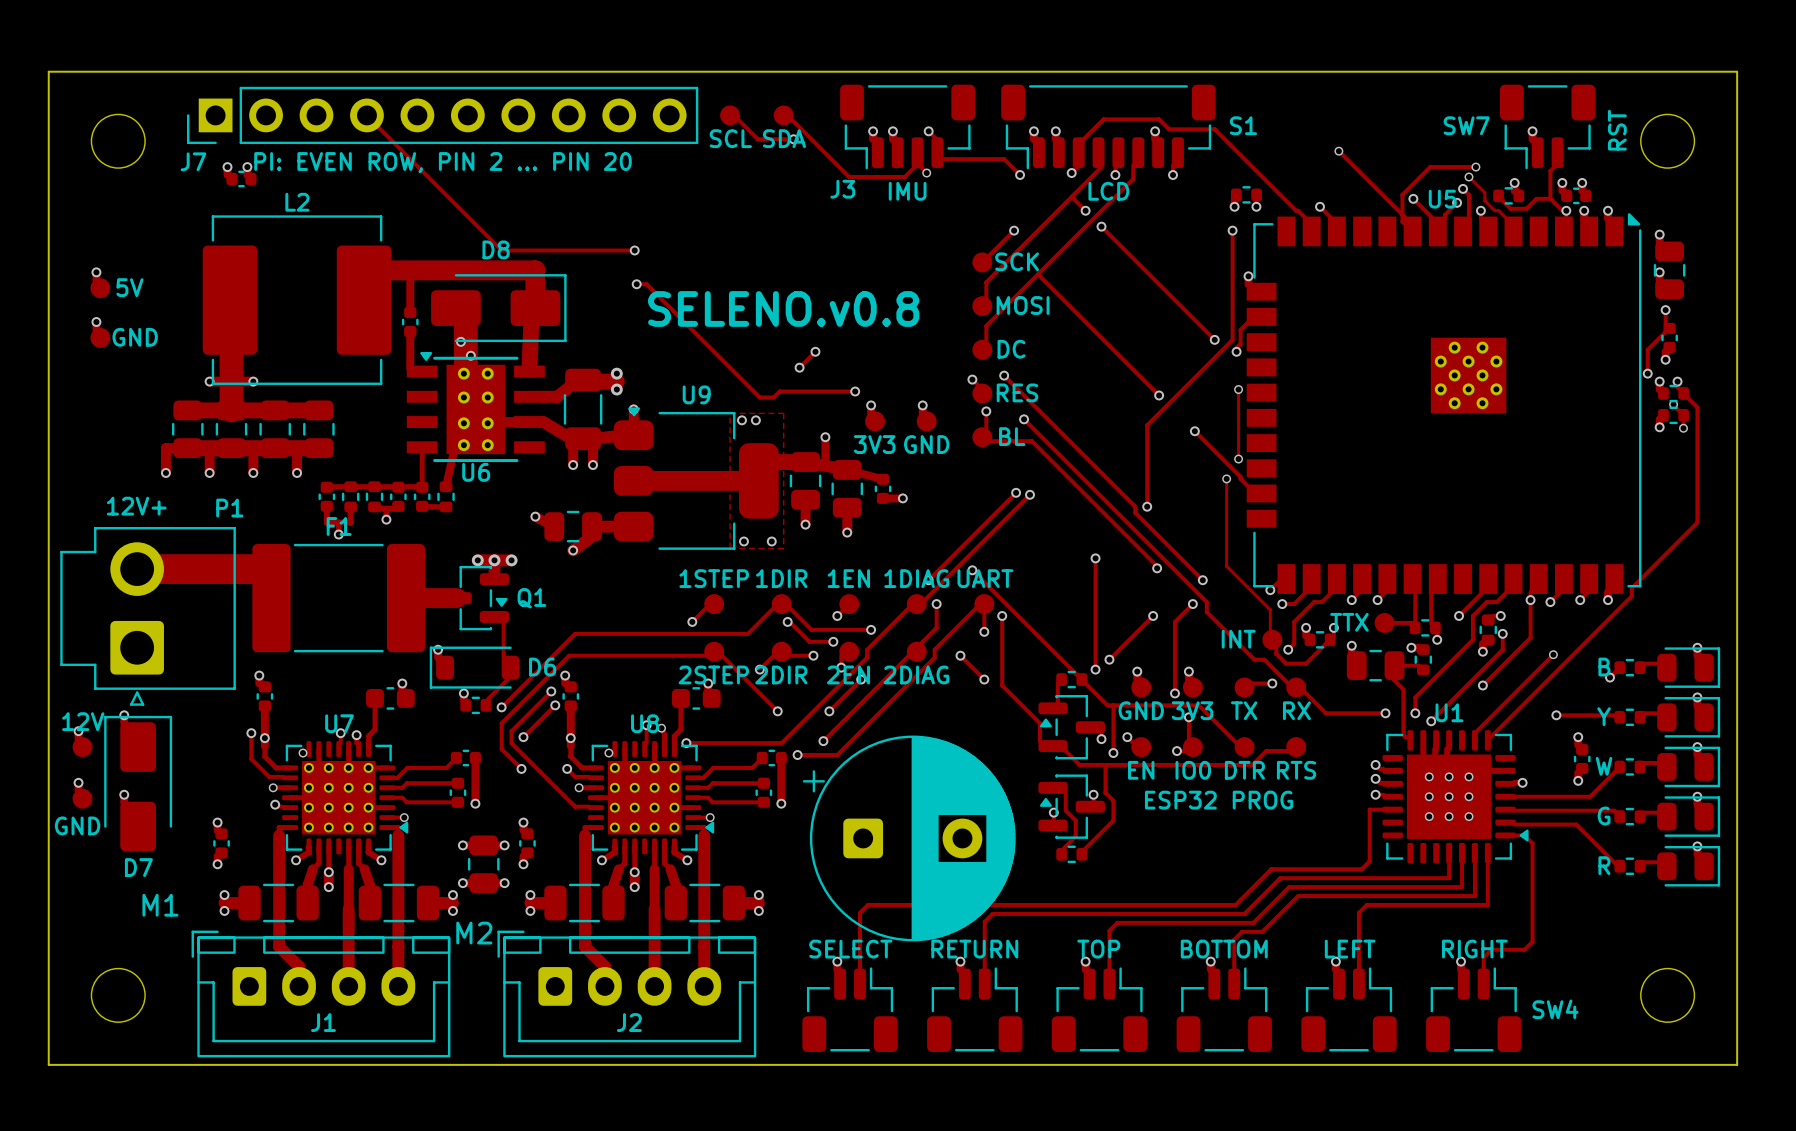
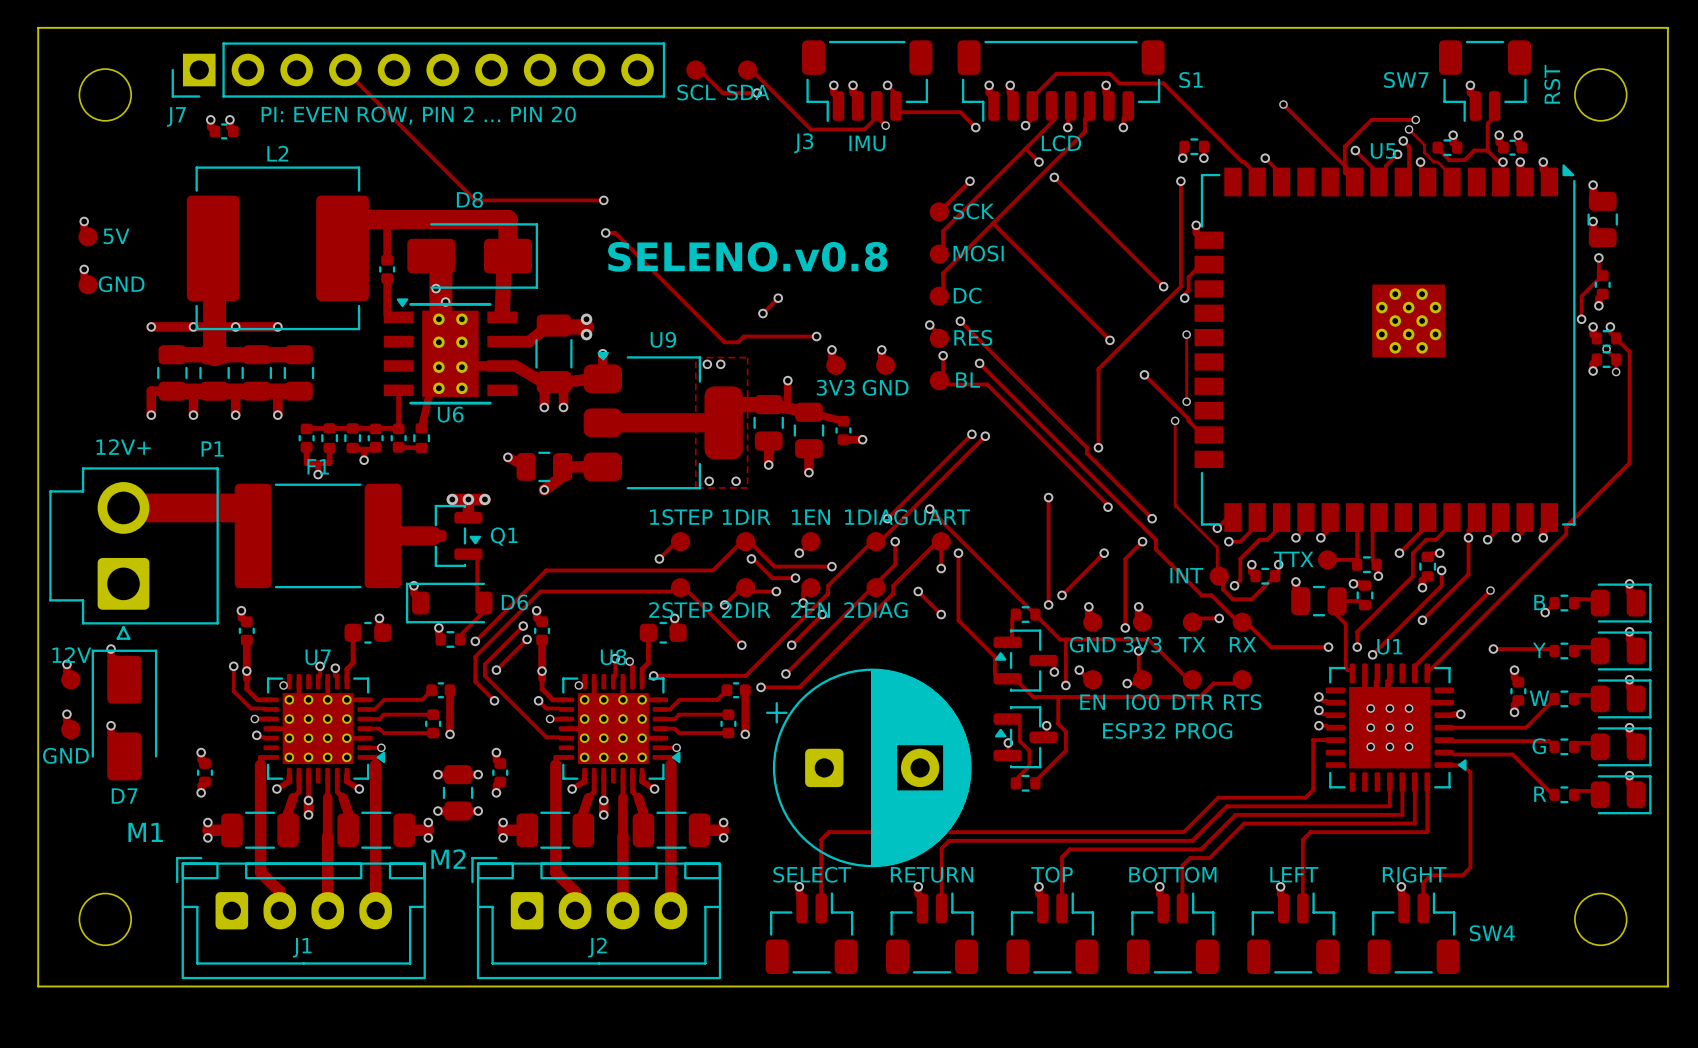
track: none -> (151, 326) (193, 326)
via: none -> (151, 326)
track: none -> (235, 326) (277, 326)
via: none -> (277, 326)

